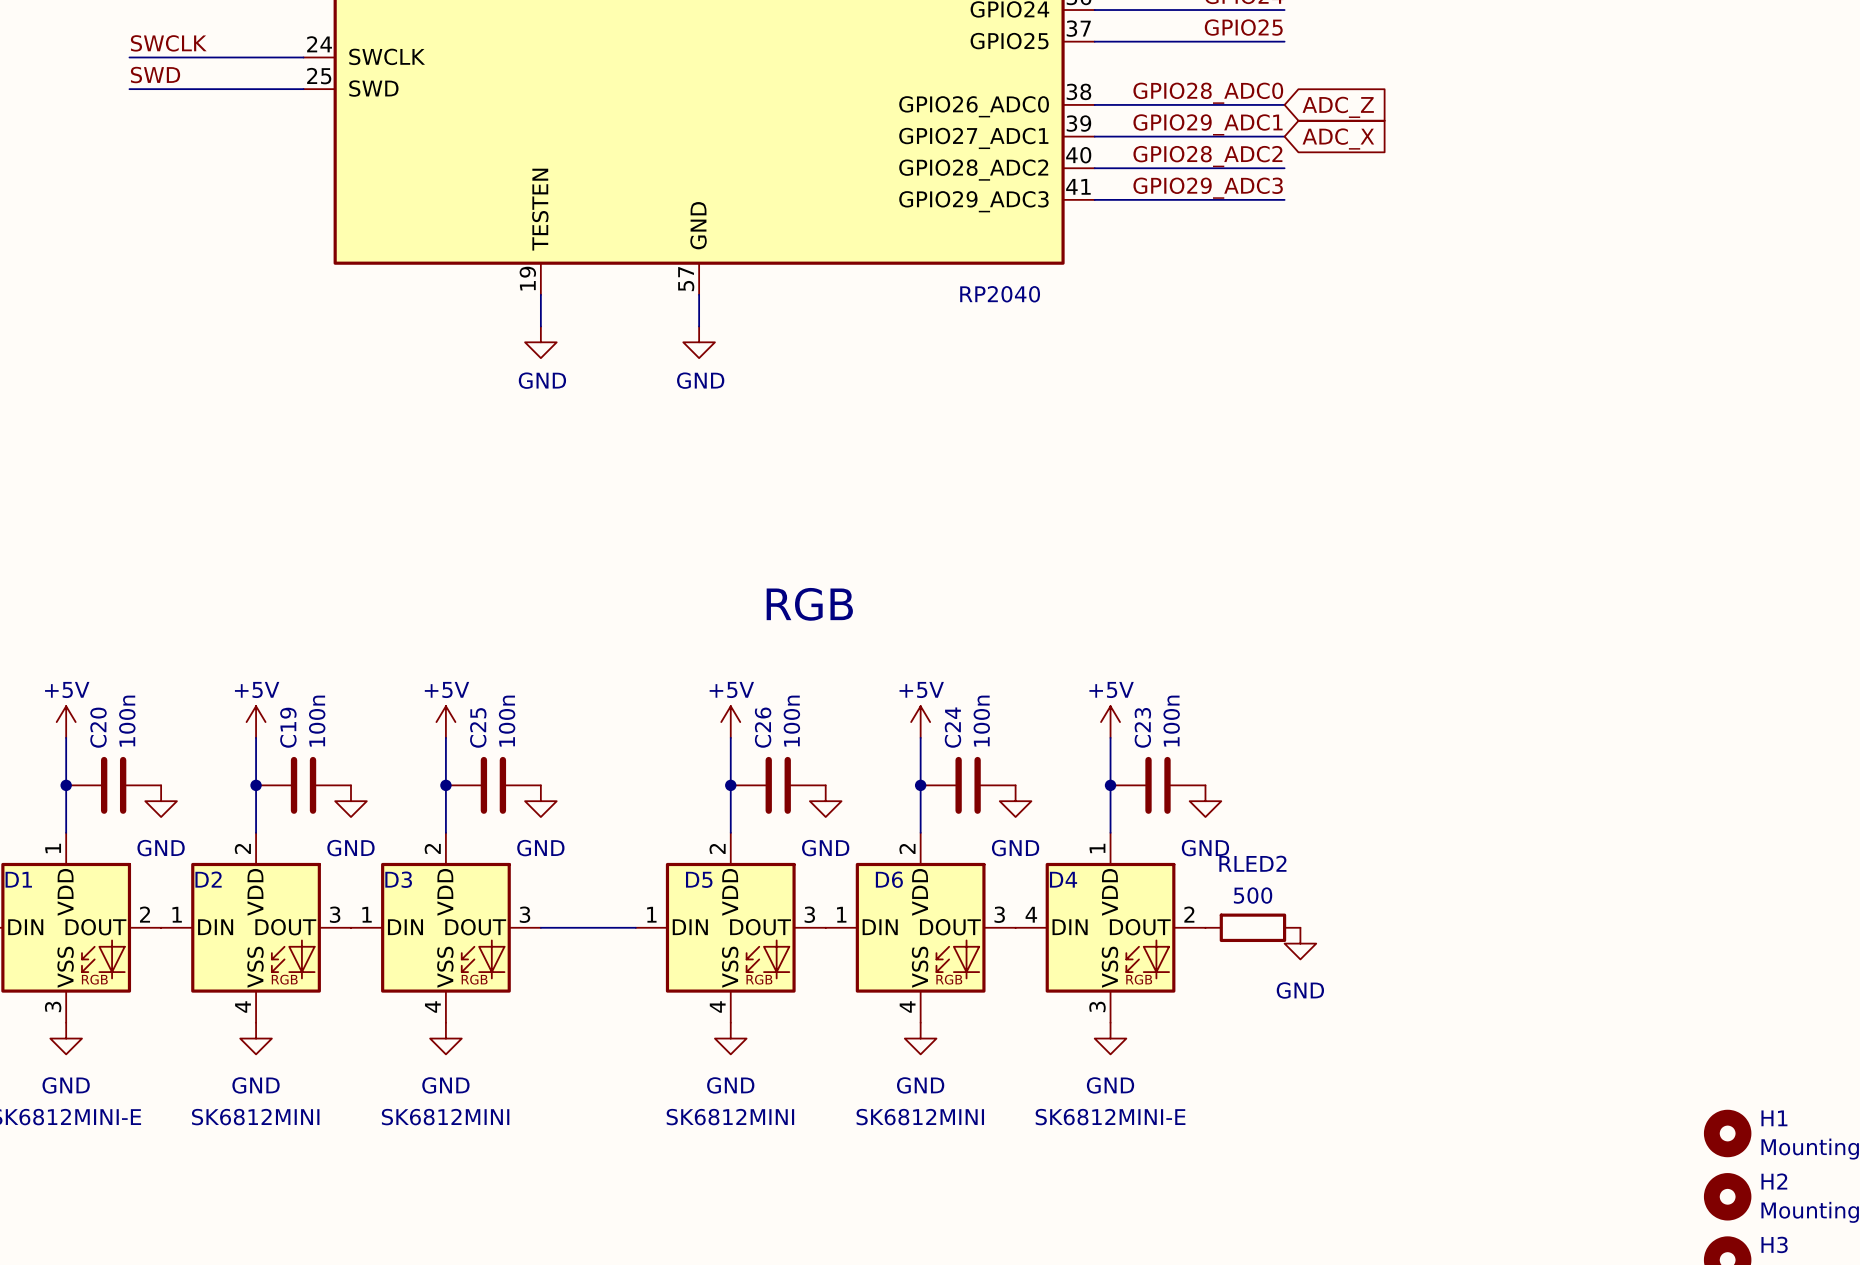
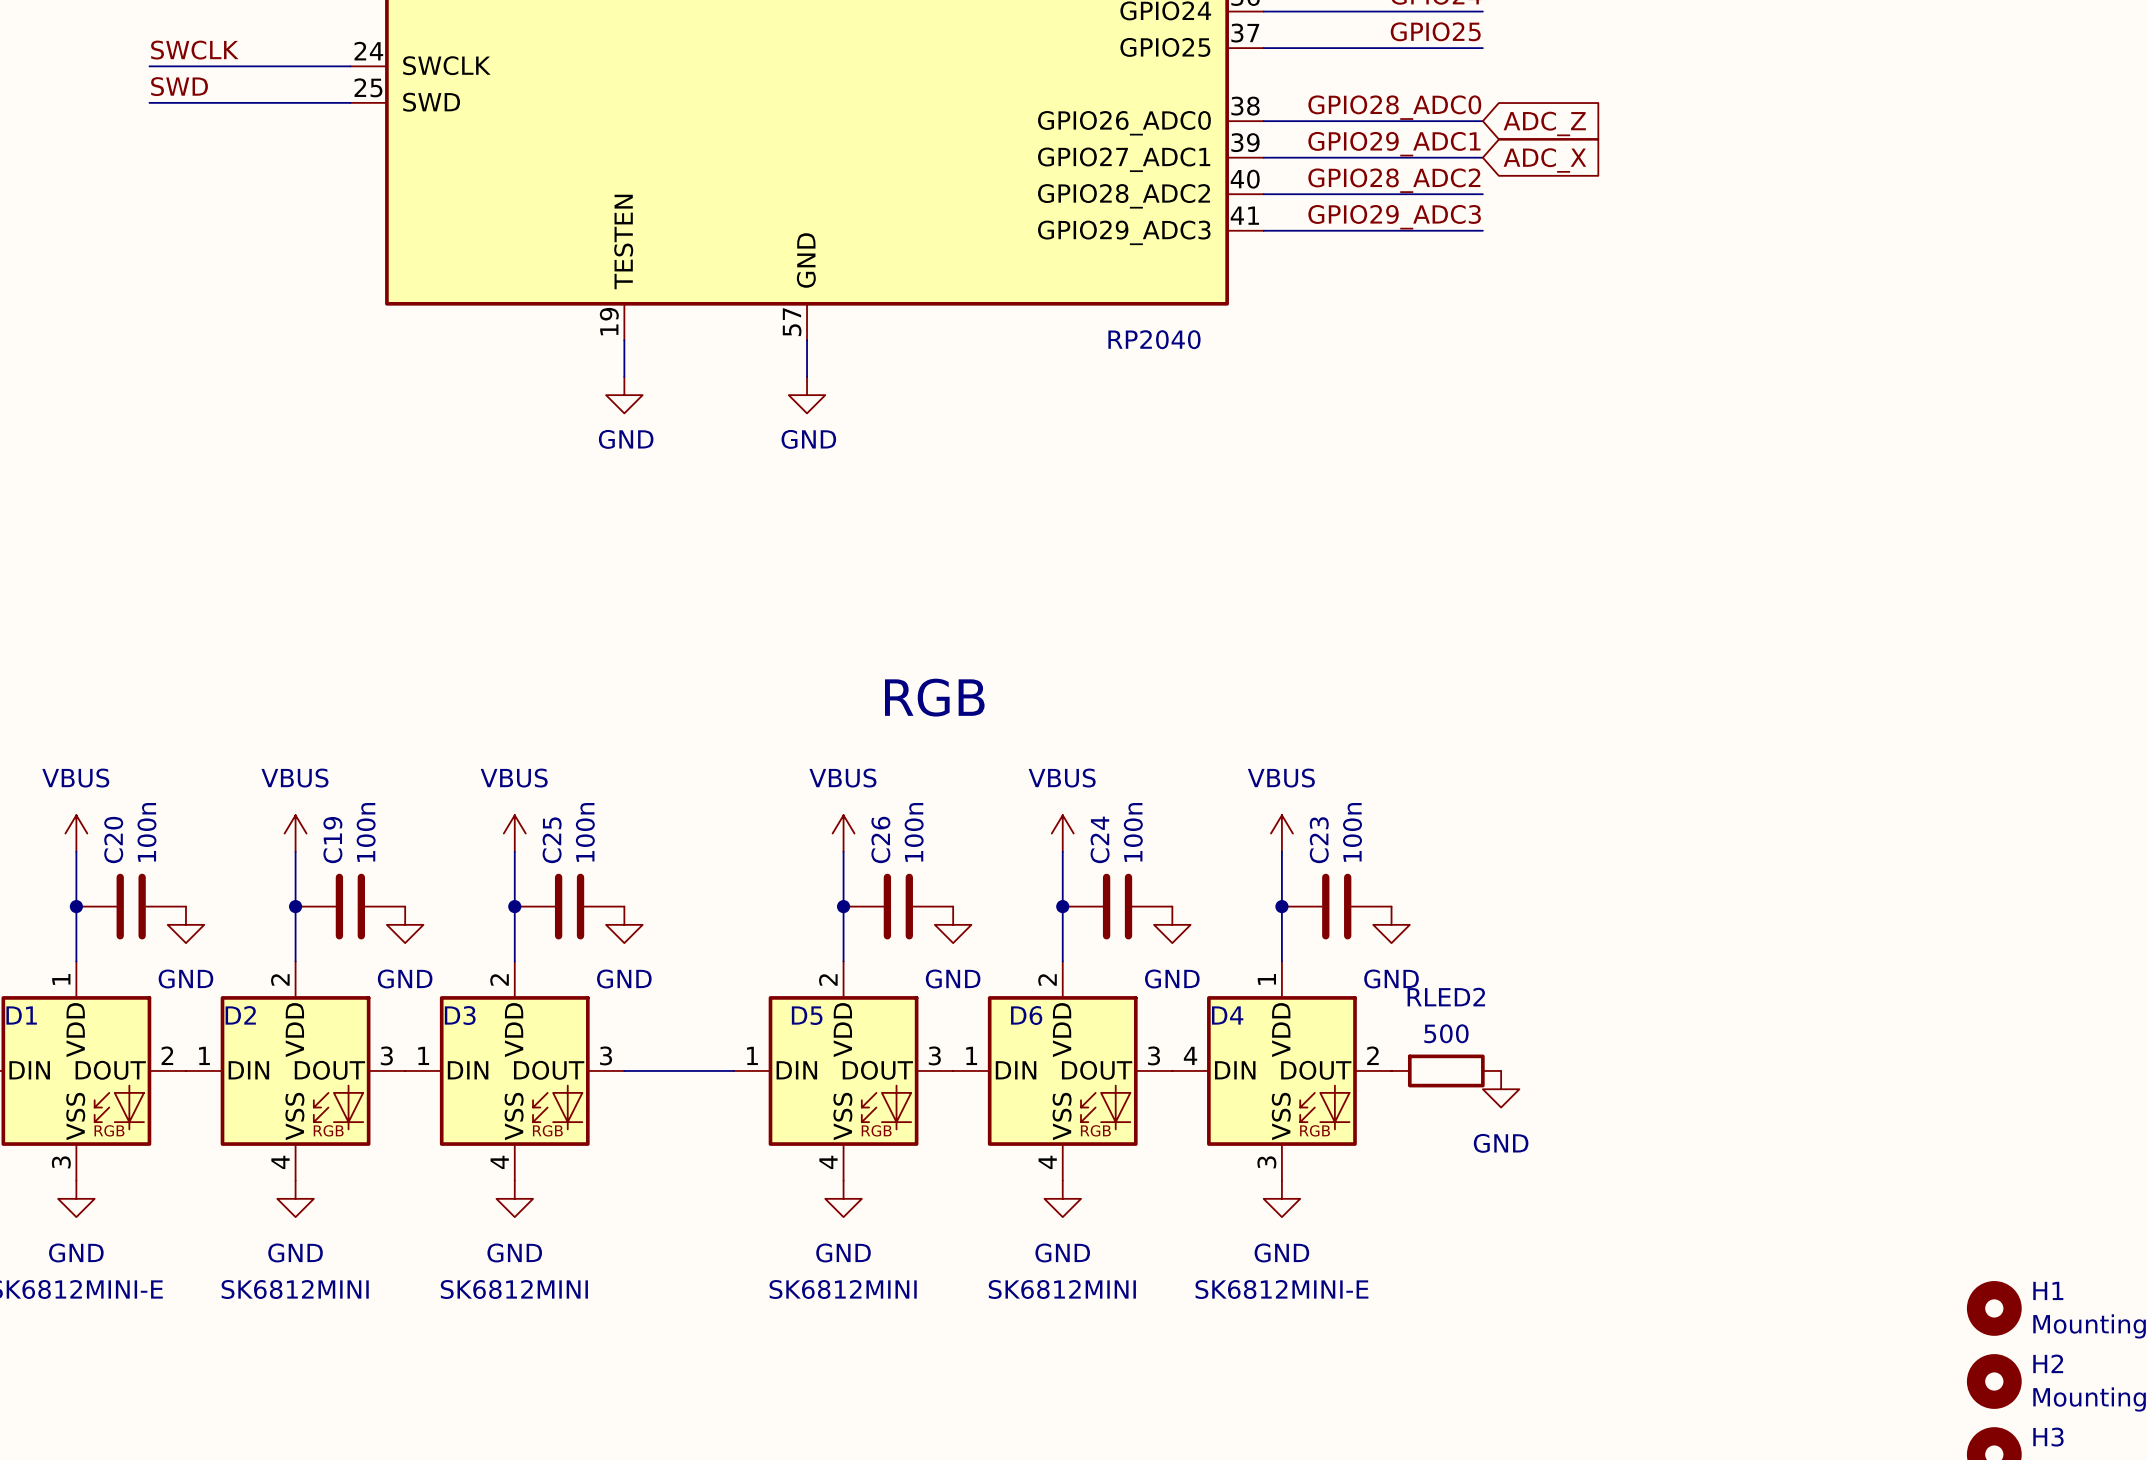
power symbol: +5V (66, 722) -> VBUS (76, 833)
power symbol: +5V (256, 722) -> VBUS (295, 833)
power symbol: +5V (445, 722) -> VBUS (514, 833)
power symbol: +5V (730, 722) -> VBUS (843, 833)
power symbol: +5V (920, 722) -> VBUS (1062, 833)
power symbol: +5V (1110, 722) -> VBUS (1281, 833)

